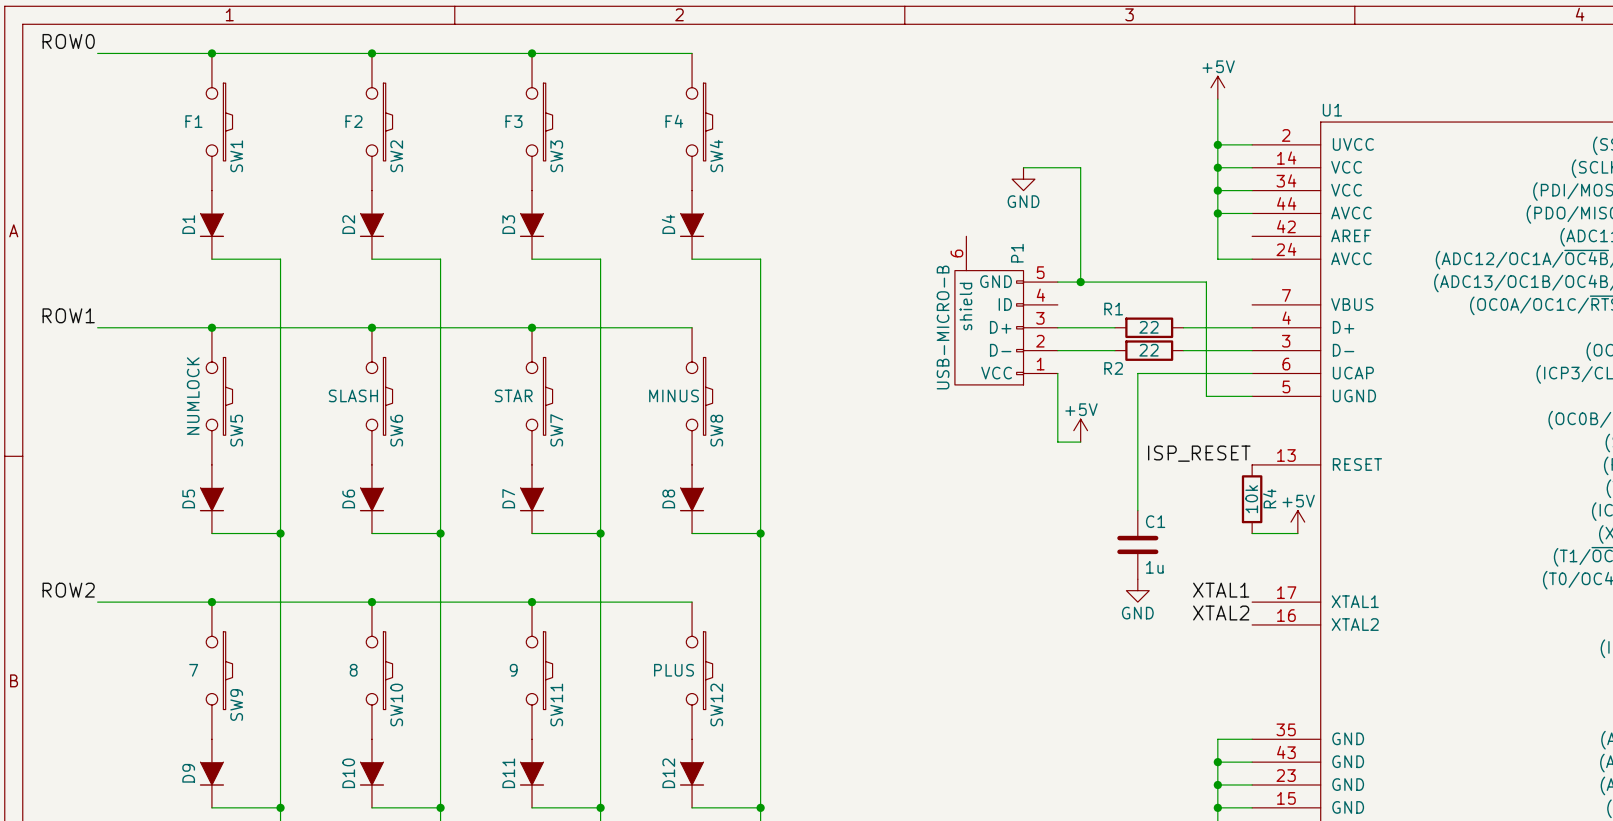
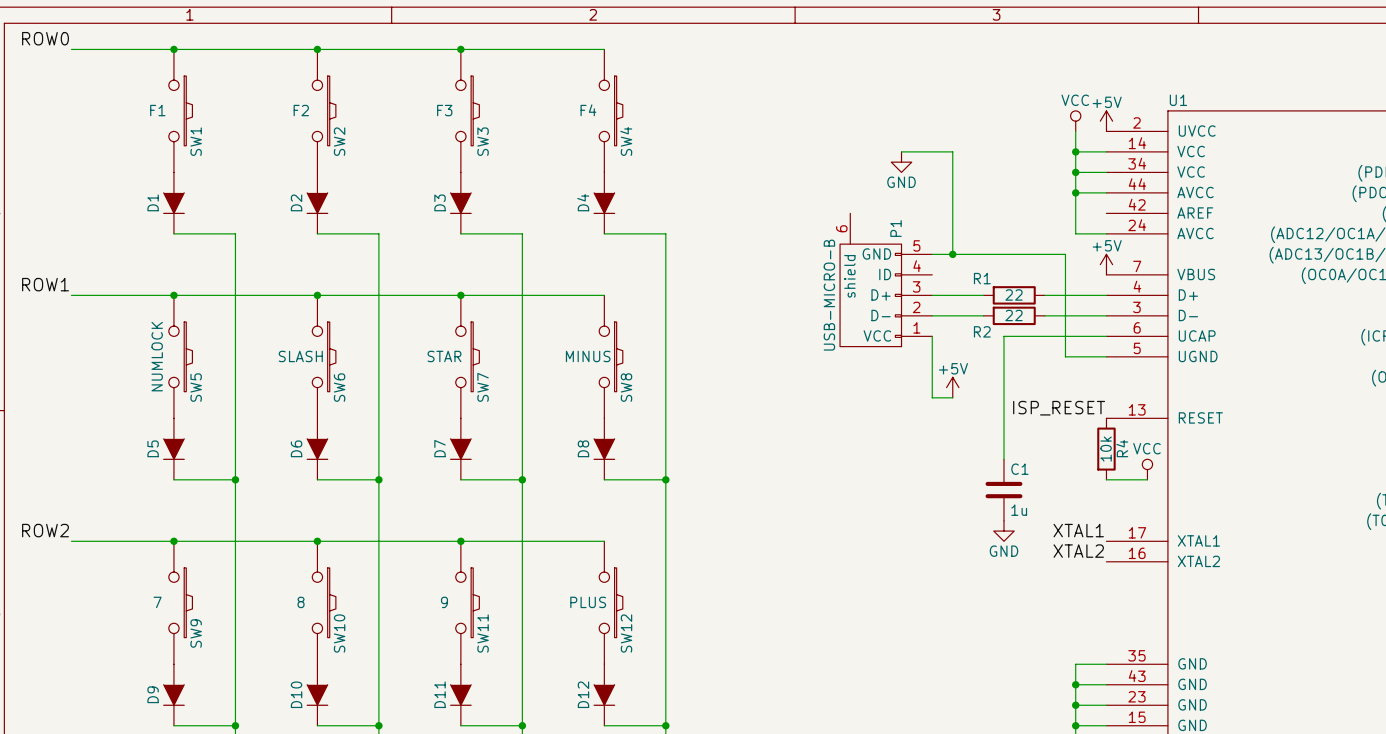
power symbol position: +5V (1217, 87) -> +5V (1106, 121)
wire: (1217, 99) (1217, 144) (1252, 144) -> none
power symbol: none -> VCC (1075, 121)
junction: (1217, 144) -> none
power symbol: none -> +5V (1106, 264)
power symbol: +5V (1297, 522) -> VCC (1147, 469)

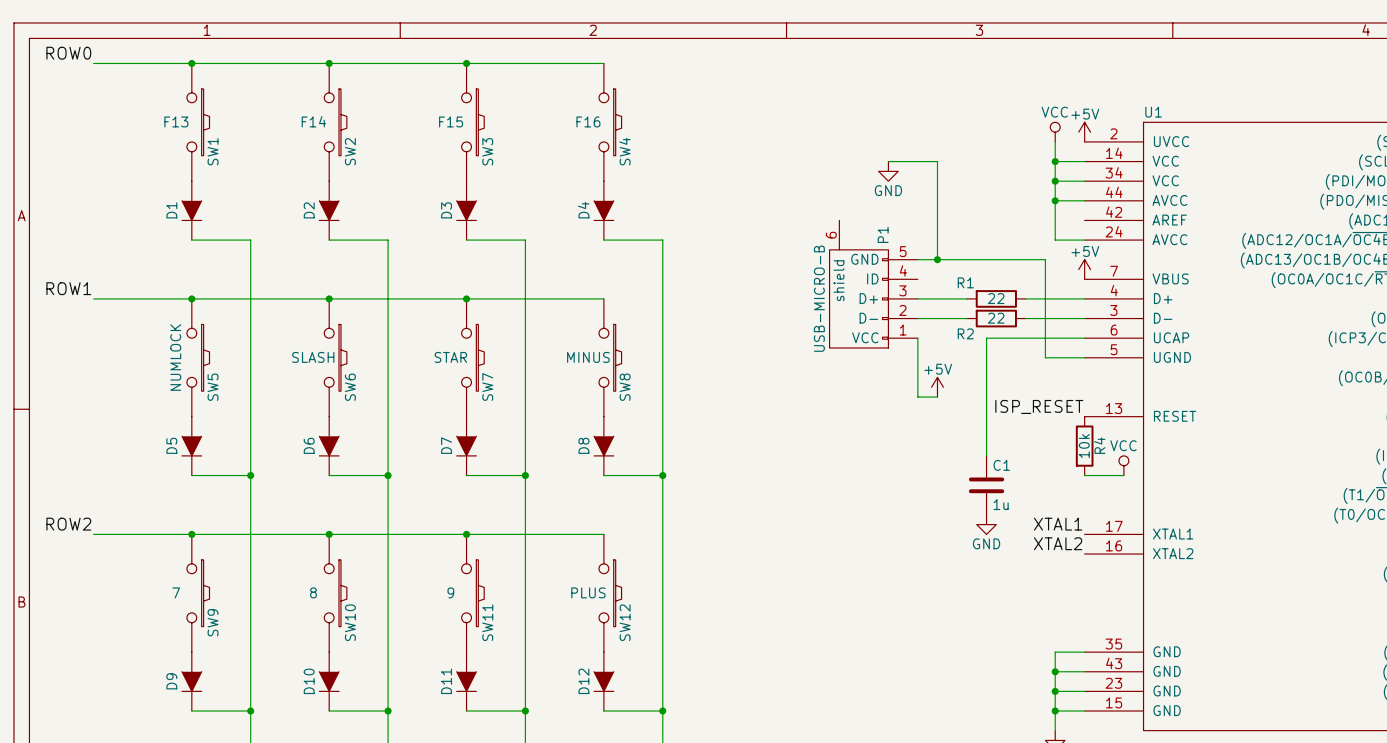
SW1 value: F1 (157, 110) -> F13 (176, 121)
SW2 value: F2 (301, 110) -> F14 (313, 121)
SW3 value: F3 (444, 110) -> F15 (451, 121)
SW4 value: F4 (588, 110) -> F16 (588, 121)

